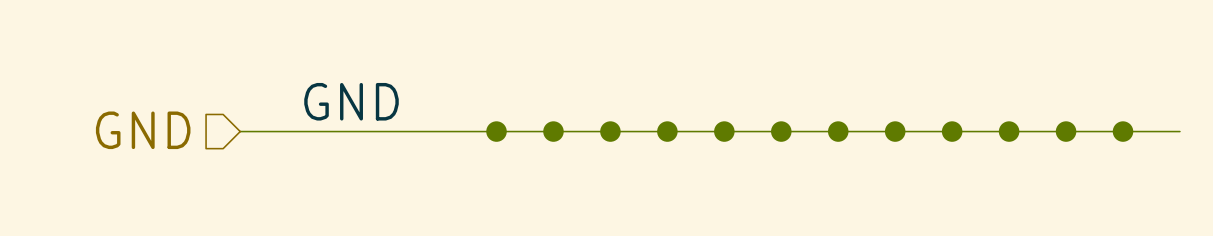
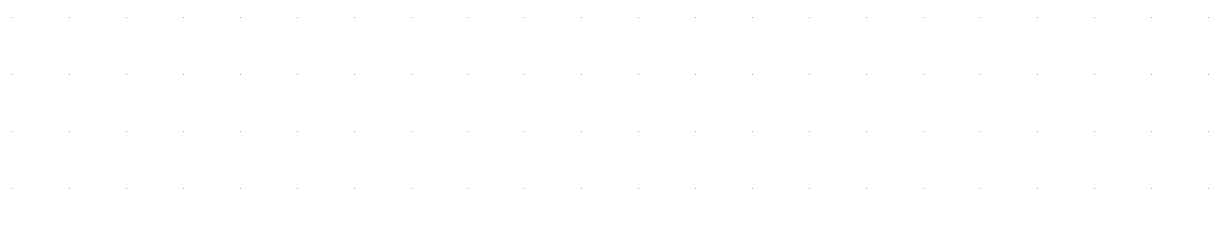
label: GND (351, 101) -> none
hierarchical label: GND (143, 130) -> none
wire: (240, 131) (1179, 131) -> none
junction: (496, 131) -> none
junction: (553, 131) -> none
junction: (610, 131) -> none
junction: (667, 131) -> none
junction: (724, 131) -> none
junction: (781, 131) -> none
junction: (838, 131) -> none
junction: (895, 131) -> none
junction: (952, 131) -> none
junction: (1009, 131) -> none
junction: (1066, 131) -> none
junction: (1123, 131) -> none

